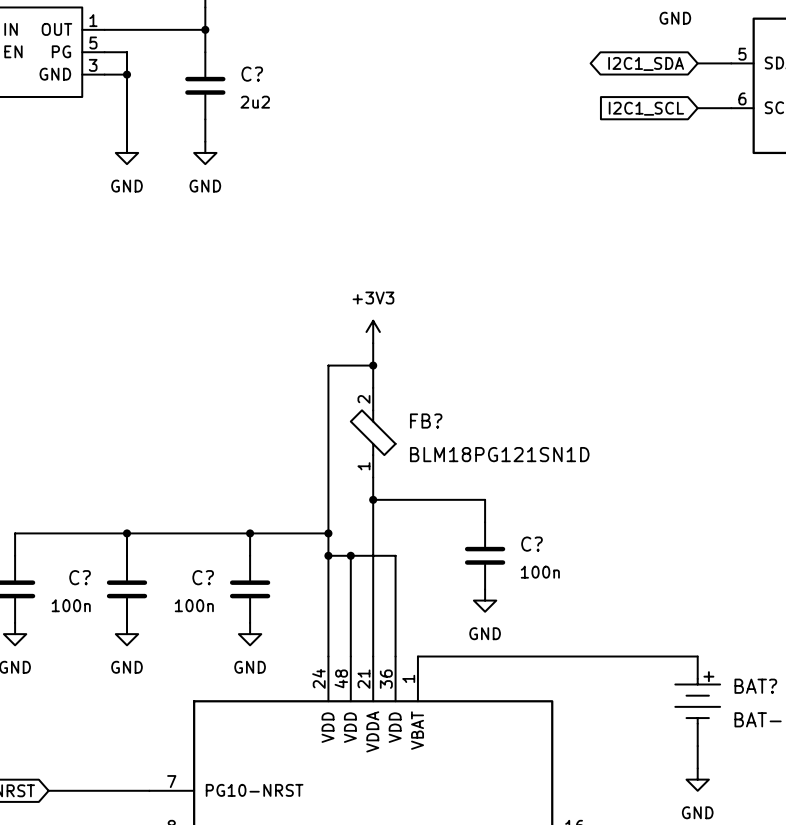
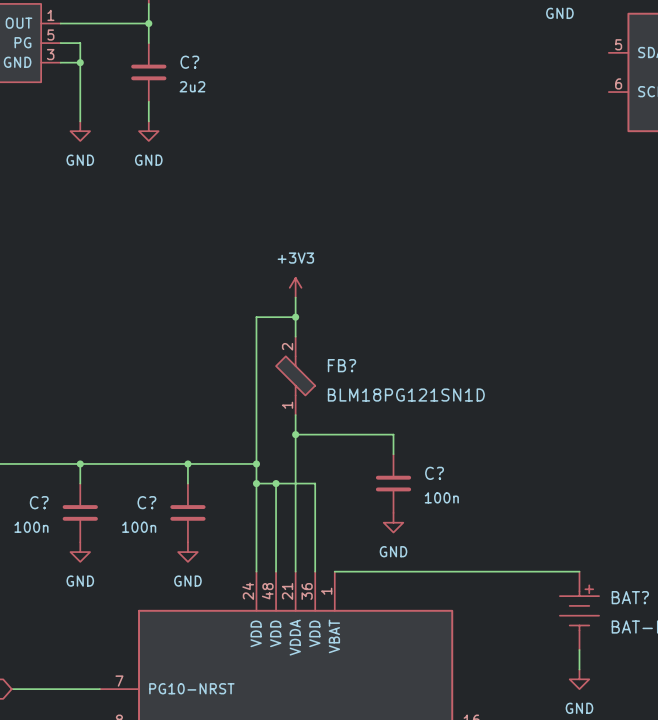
global label: I2C1_SDA (646, 63) -> none
wire: (697, 63) (731, 63) -> none
global label: I2C1_SCL (646, 108) -> none
wire: (697, 108) (731, 108) -> none

